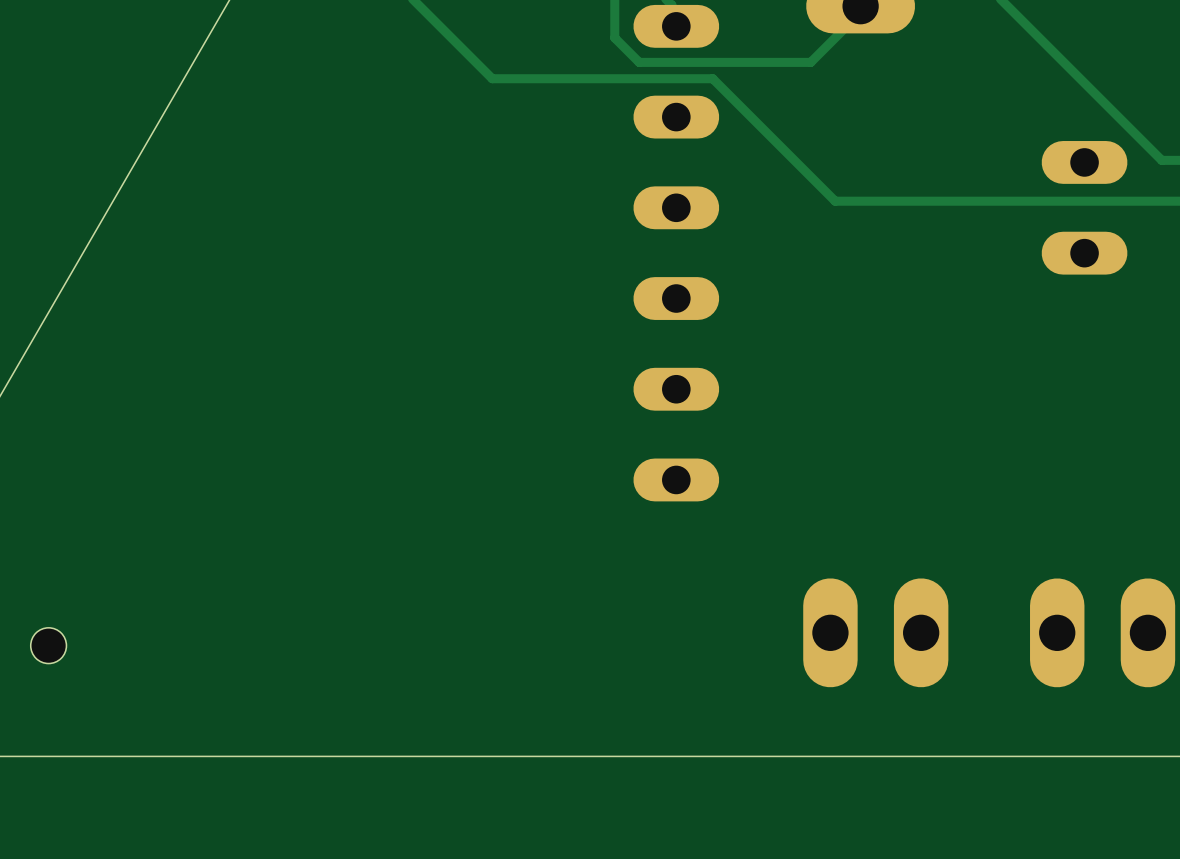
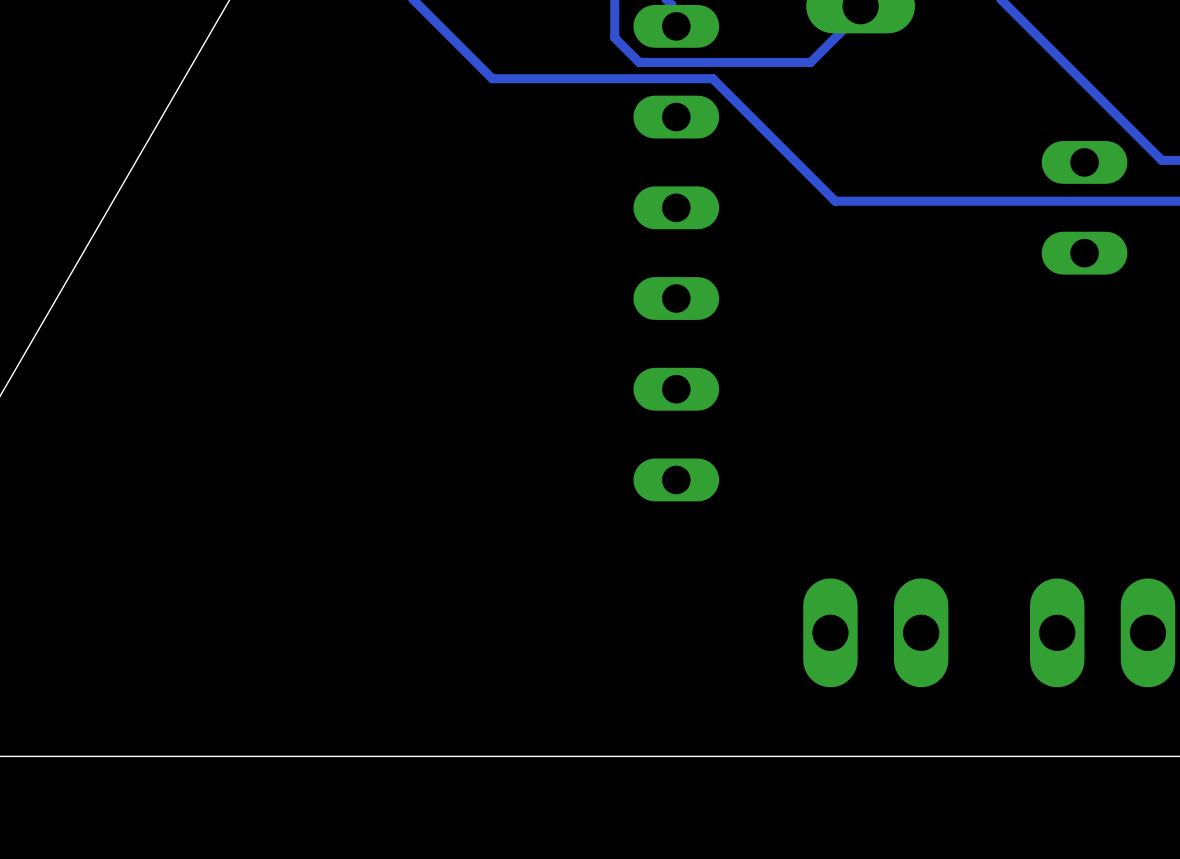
hole: (48, 645) -> none

